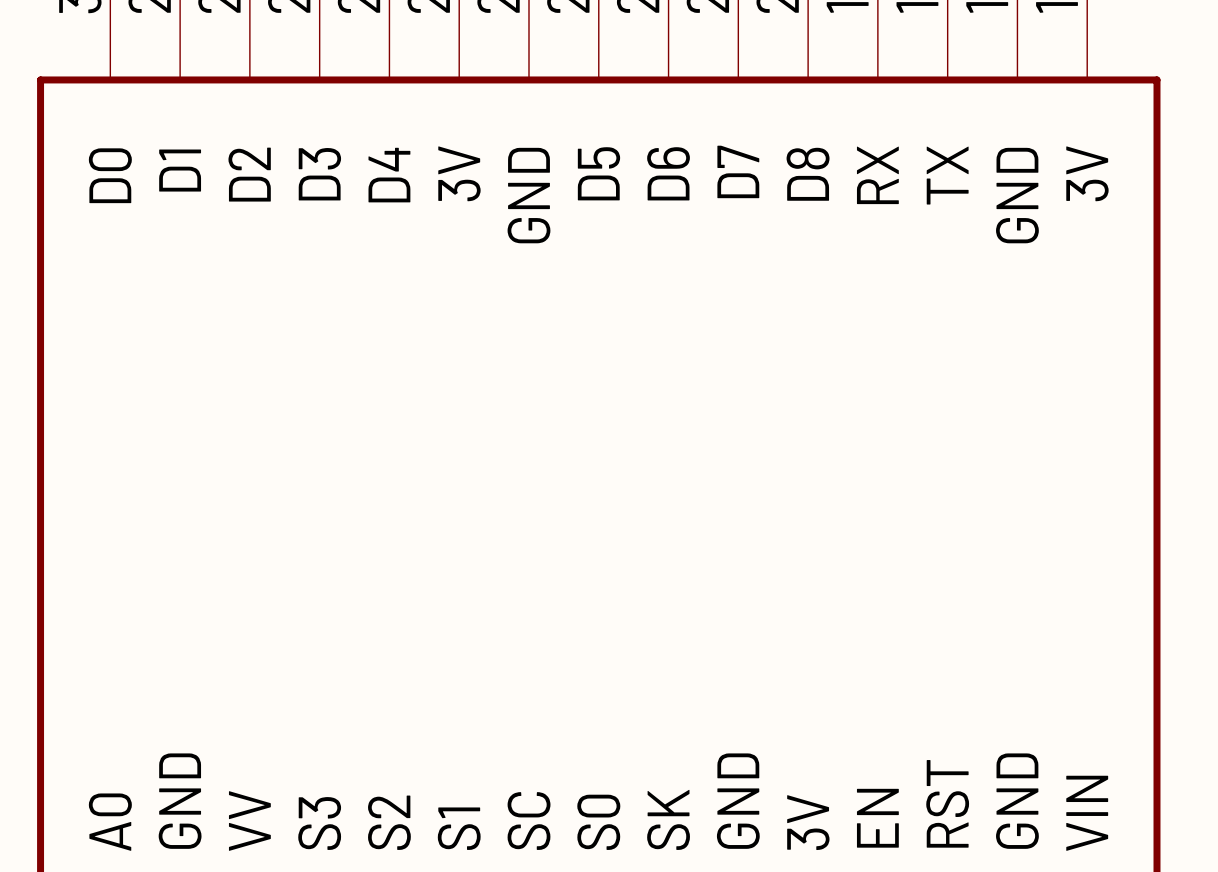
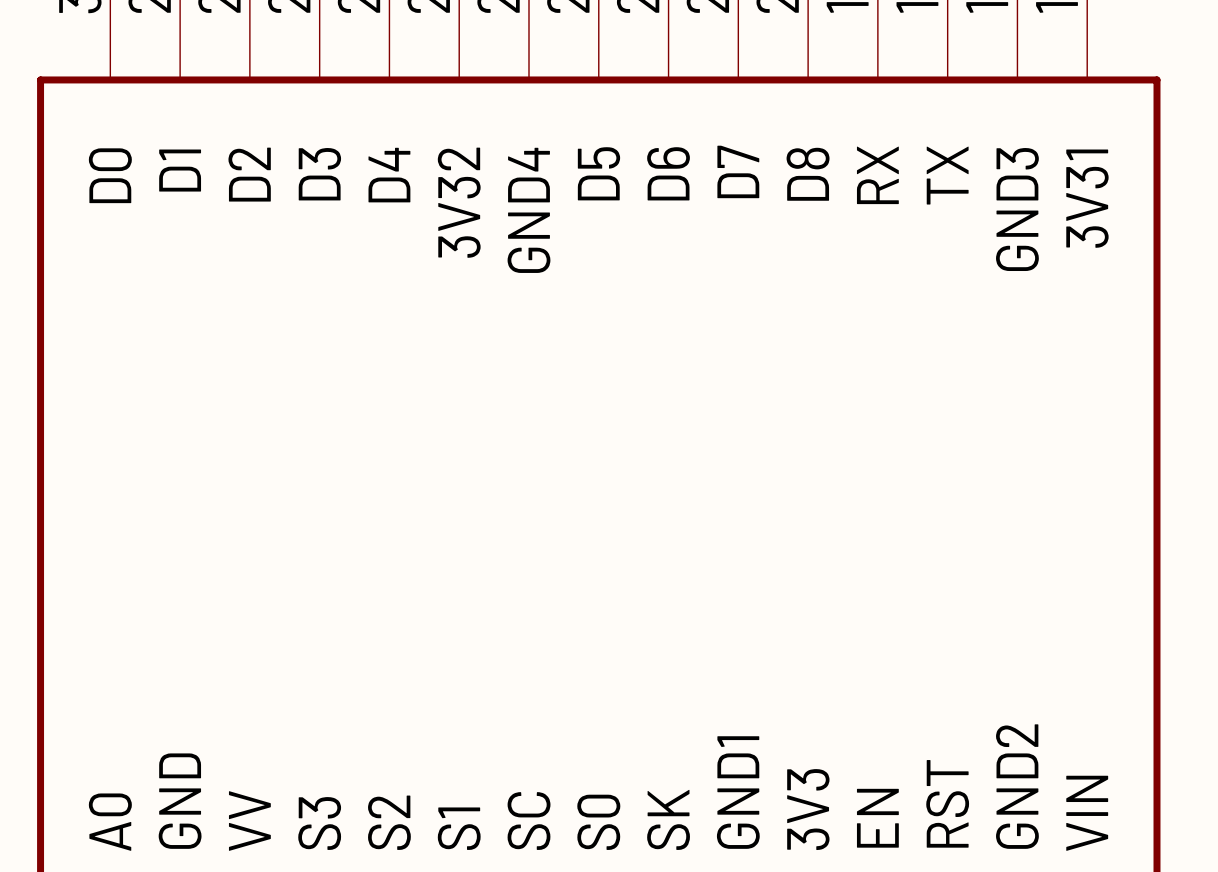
part pin name: 3V (459, 173) -> 3V32 (459, 202)
part pin name: 3V (1087, 173) -> 3V31 (1087, 198)
part pin name: GND (528, 195) -> GND4 (528, 210)
part pin name: GND (1017, 195) -> GND3 (1017, 209)
part pin name: GND (738, 801) -> GND1 (738, 792)
part pin name: GND (1017, 801) -> GND2 (1017, 786)
part pin name: 3V (808, 822) -> 3V3 (808, 809)

